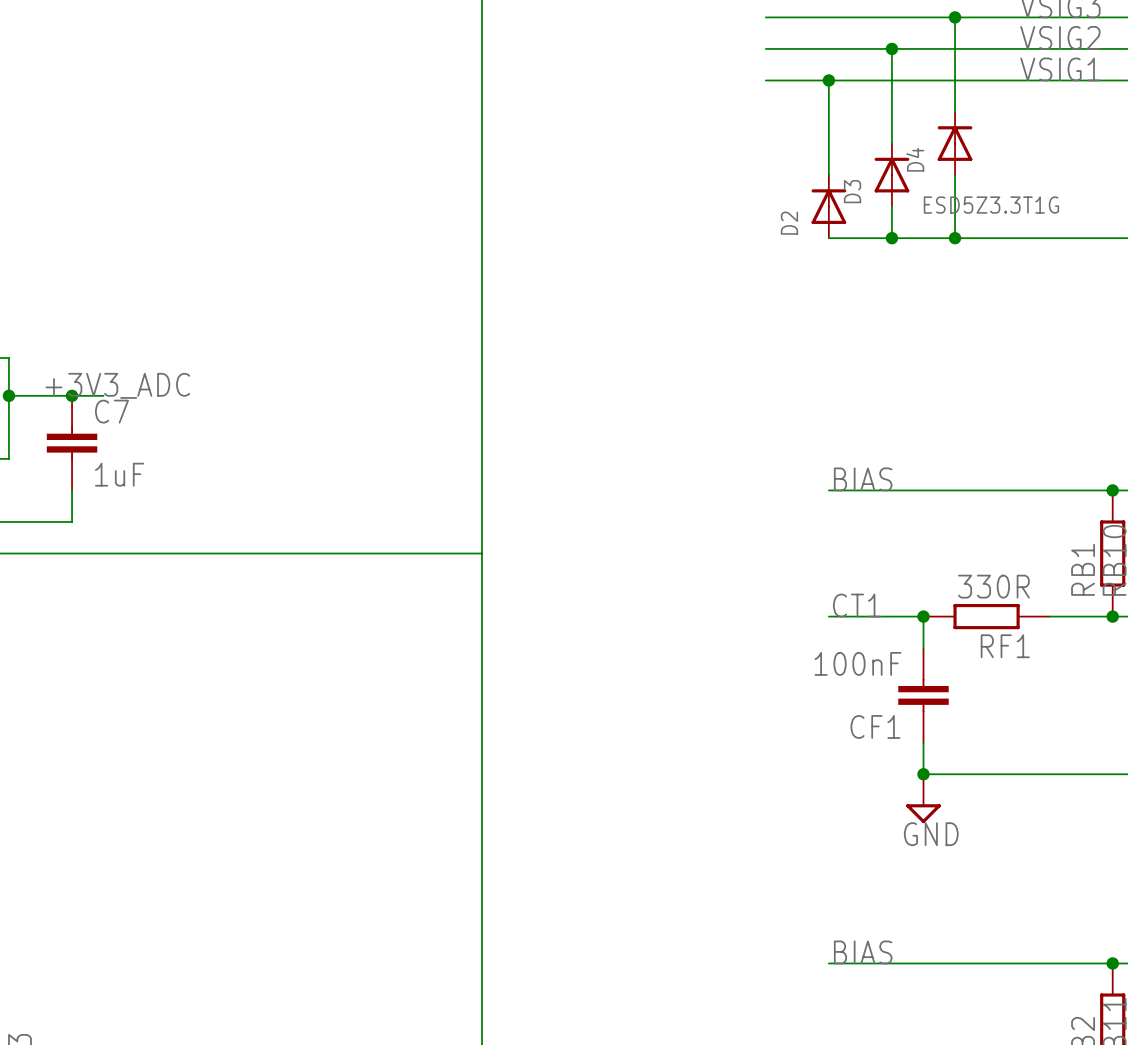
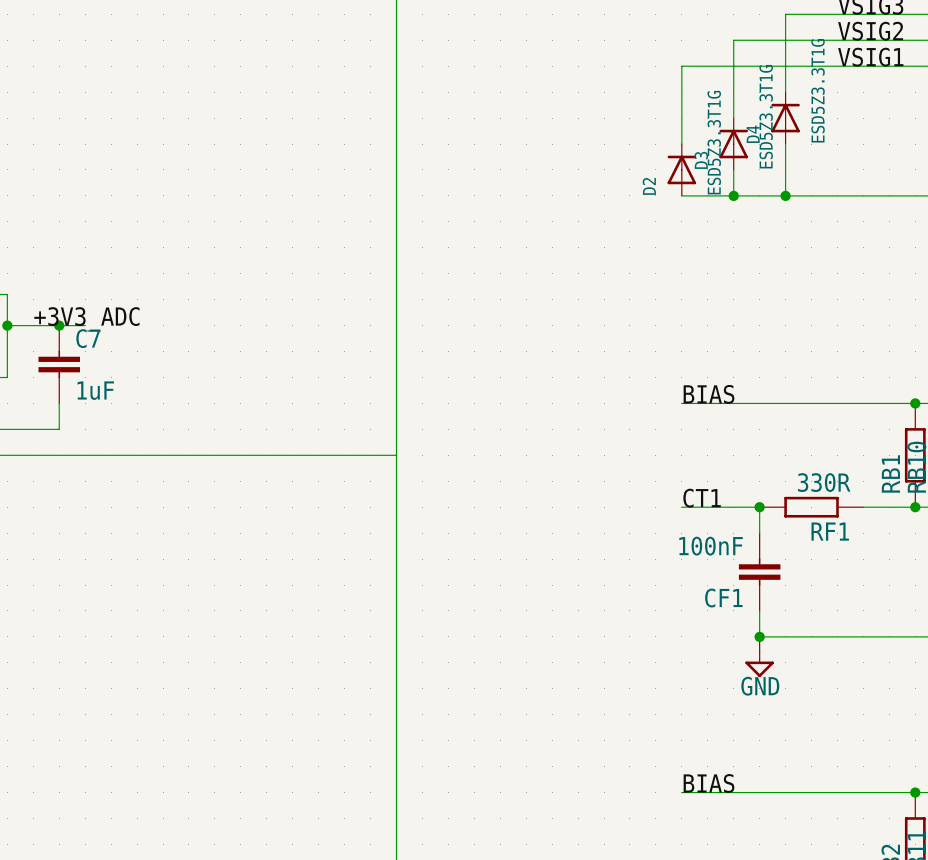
wire: (765, 17) (955, 17) -> none
junction: (955, 17) -> none
wire: (765, 48) (891, 48) -> none
junction: (891, 48) -> none
wire: (765, 80) (828, 80) -> none
junction: (828, 80) -> none
D4 value: none -> ESD5Z3.3T1G (818, 90)
D3 value: none -> ESD5Z3.3T1G (766, 116)
D2 value rotation: 0° (991, 205) -> 90° counterclockwise (714, 142)

